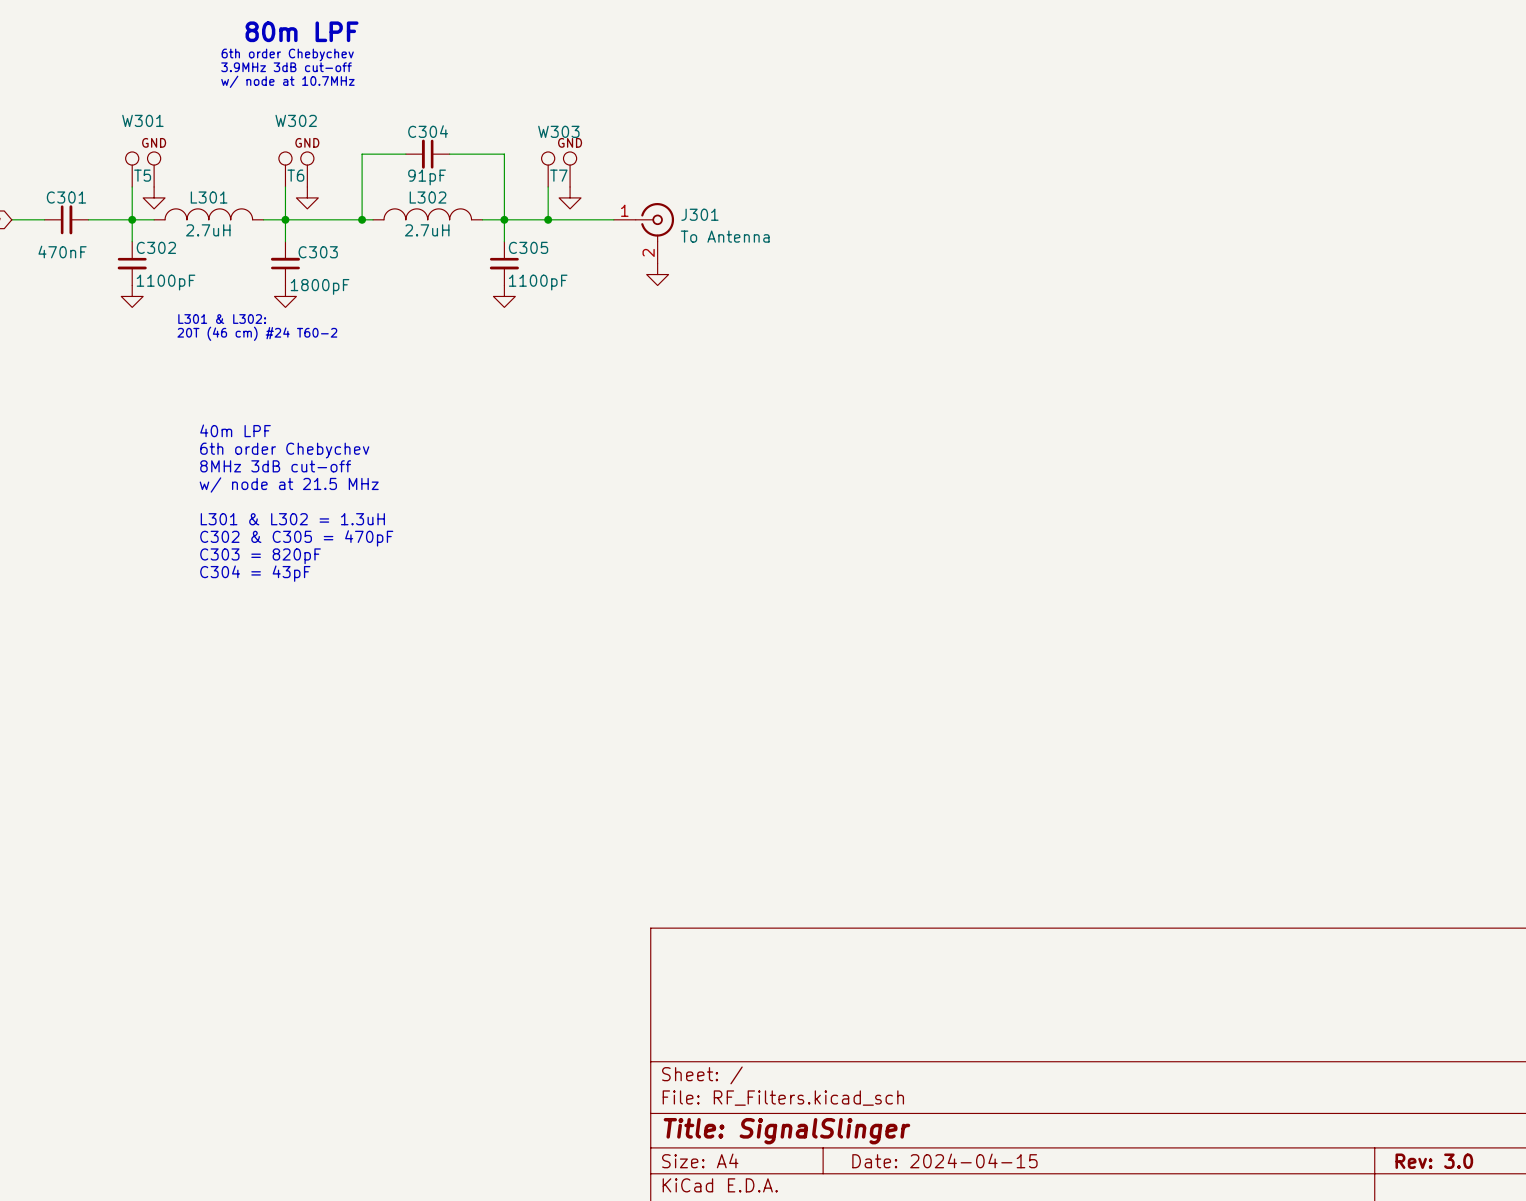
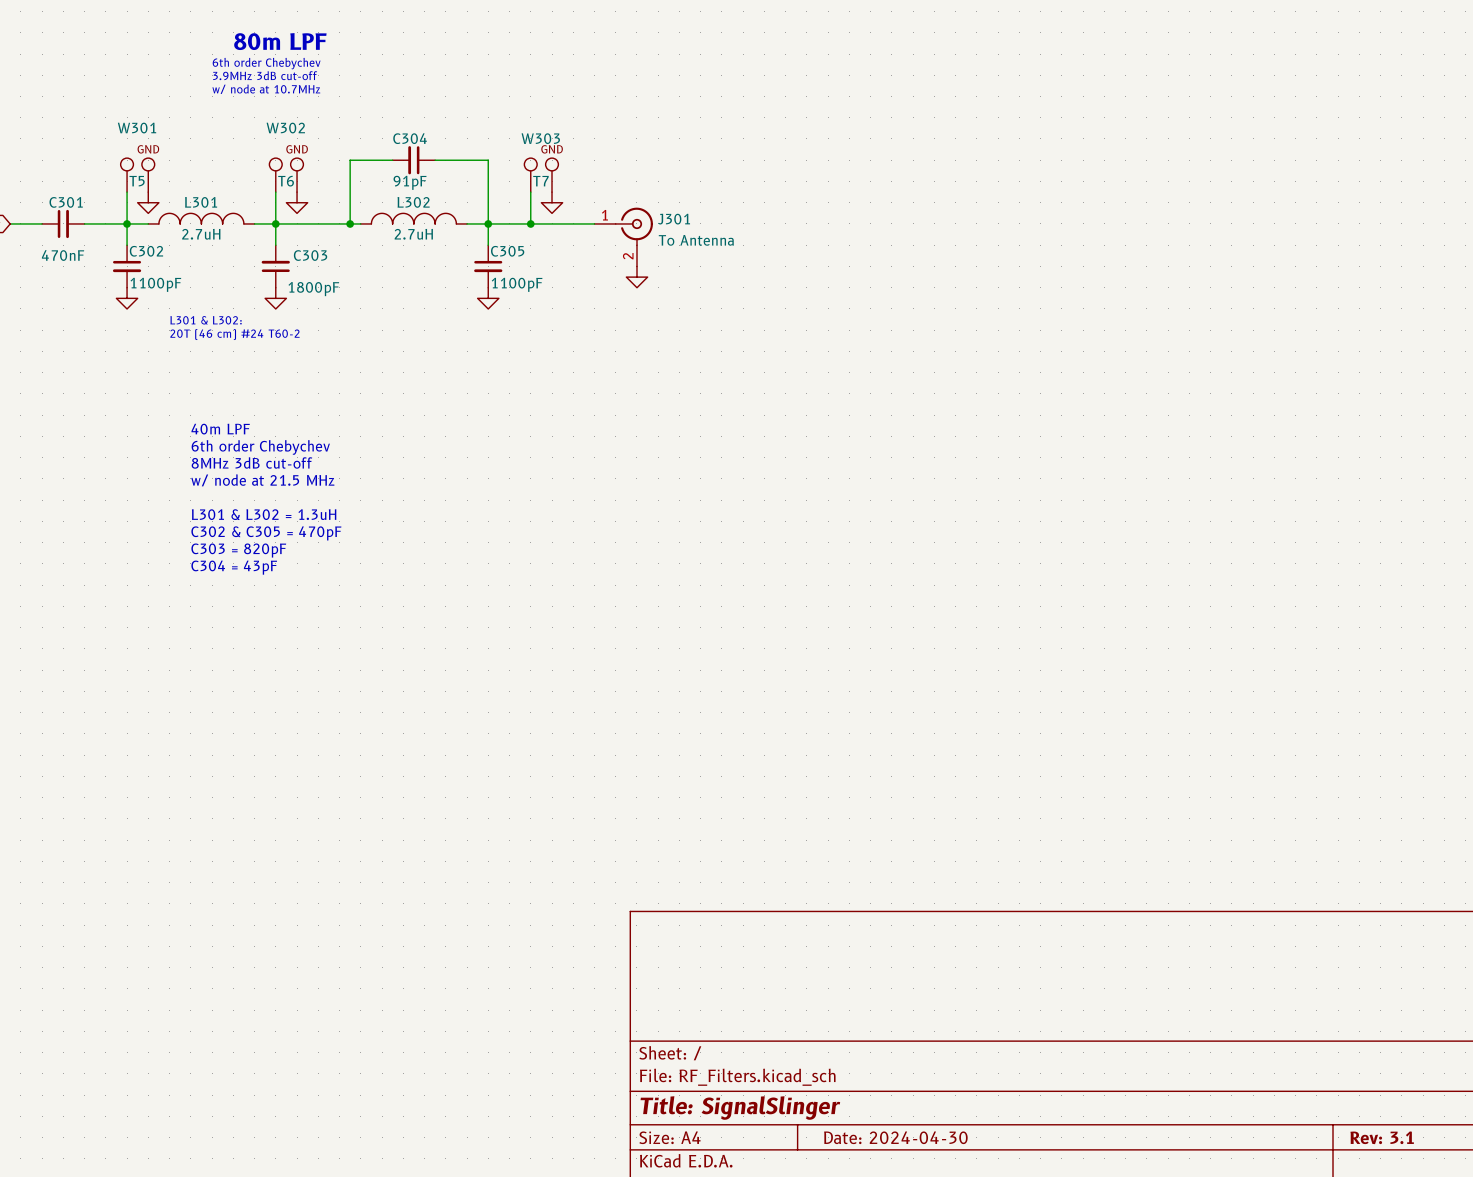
title block: Date: 2024-04-15 (944, 1160) -> Date: 2024-04-30 (895, 1137)
title block: Rev: 3.0 (1434, 1161) -> Rev: 3.1 (1382, 1137)

